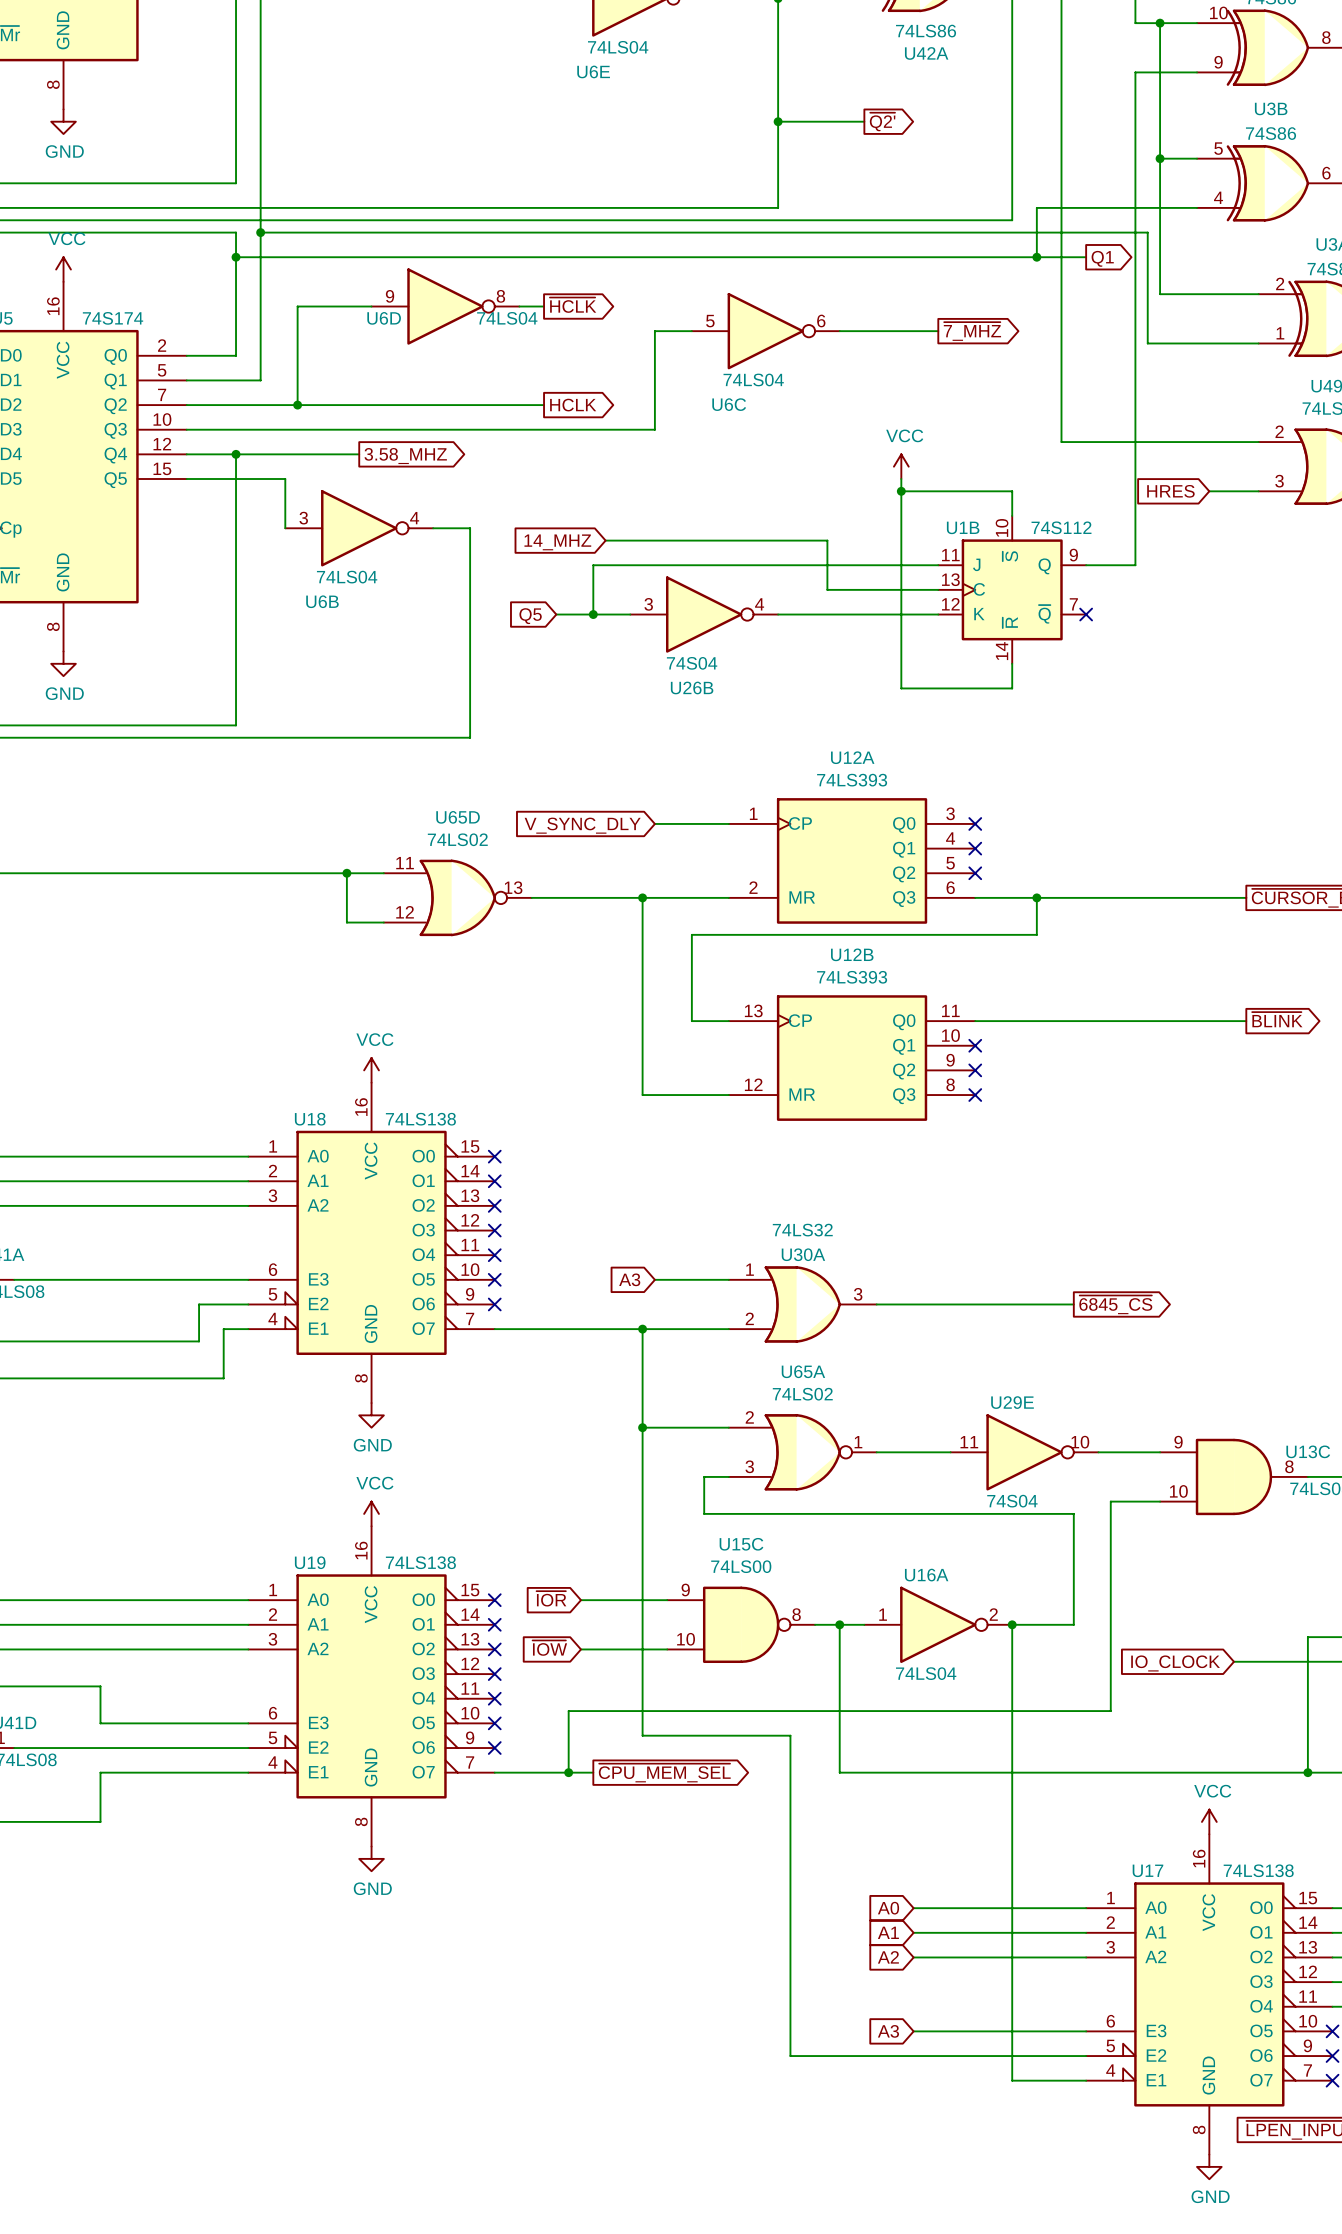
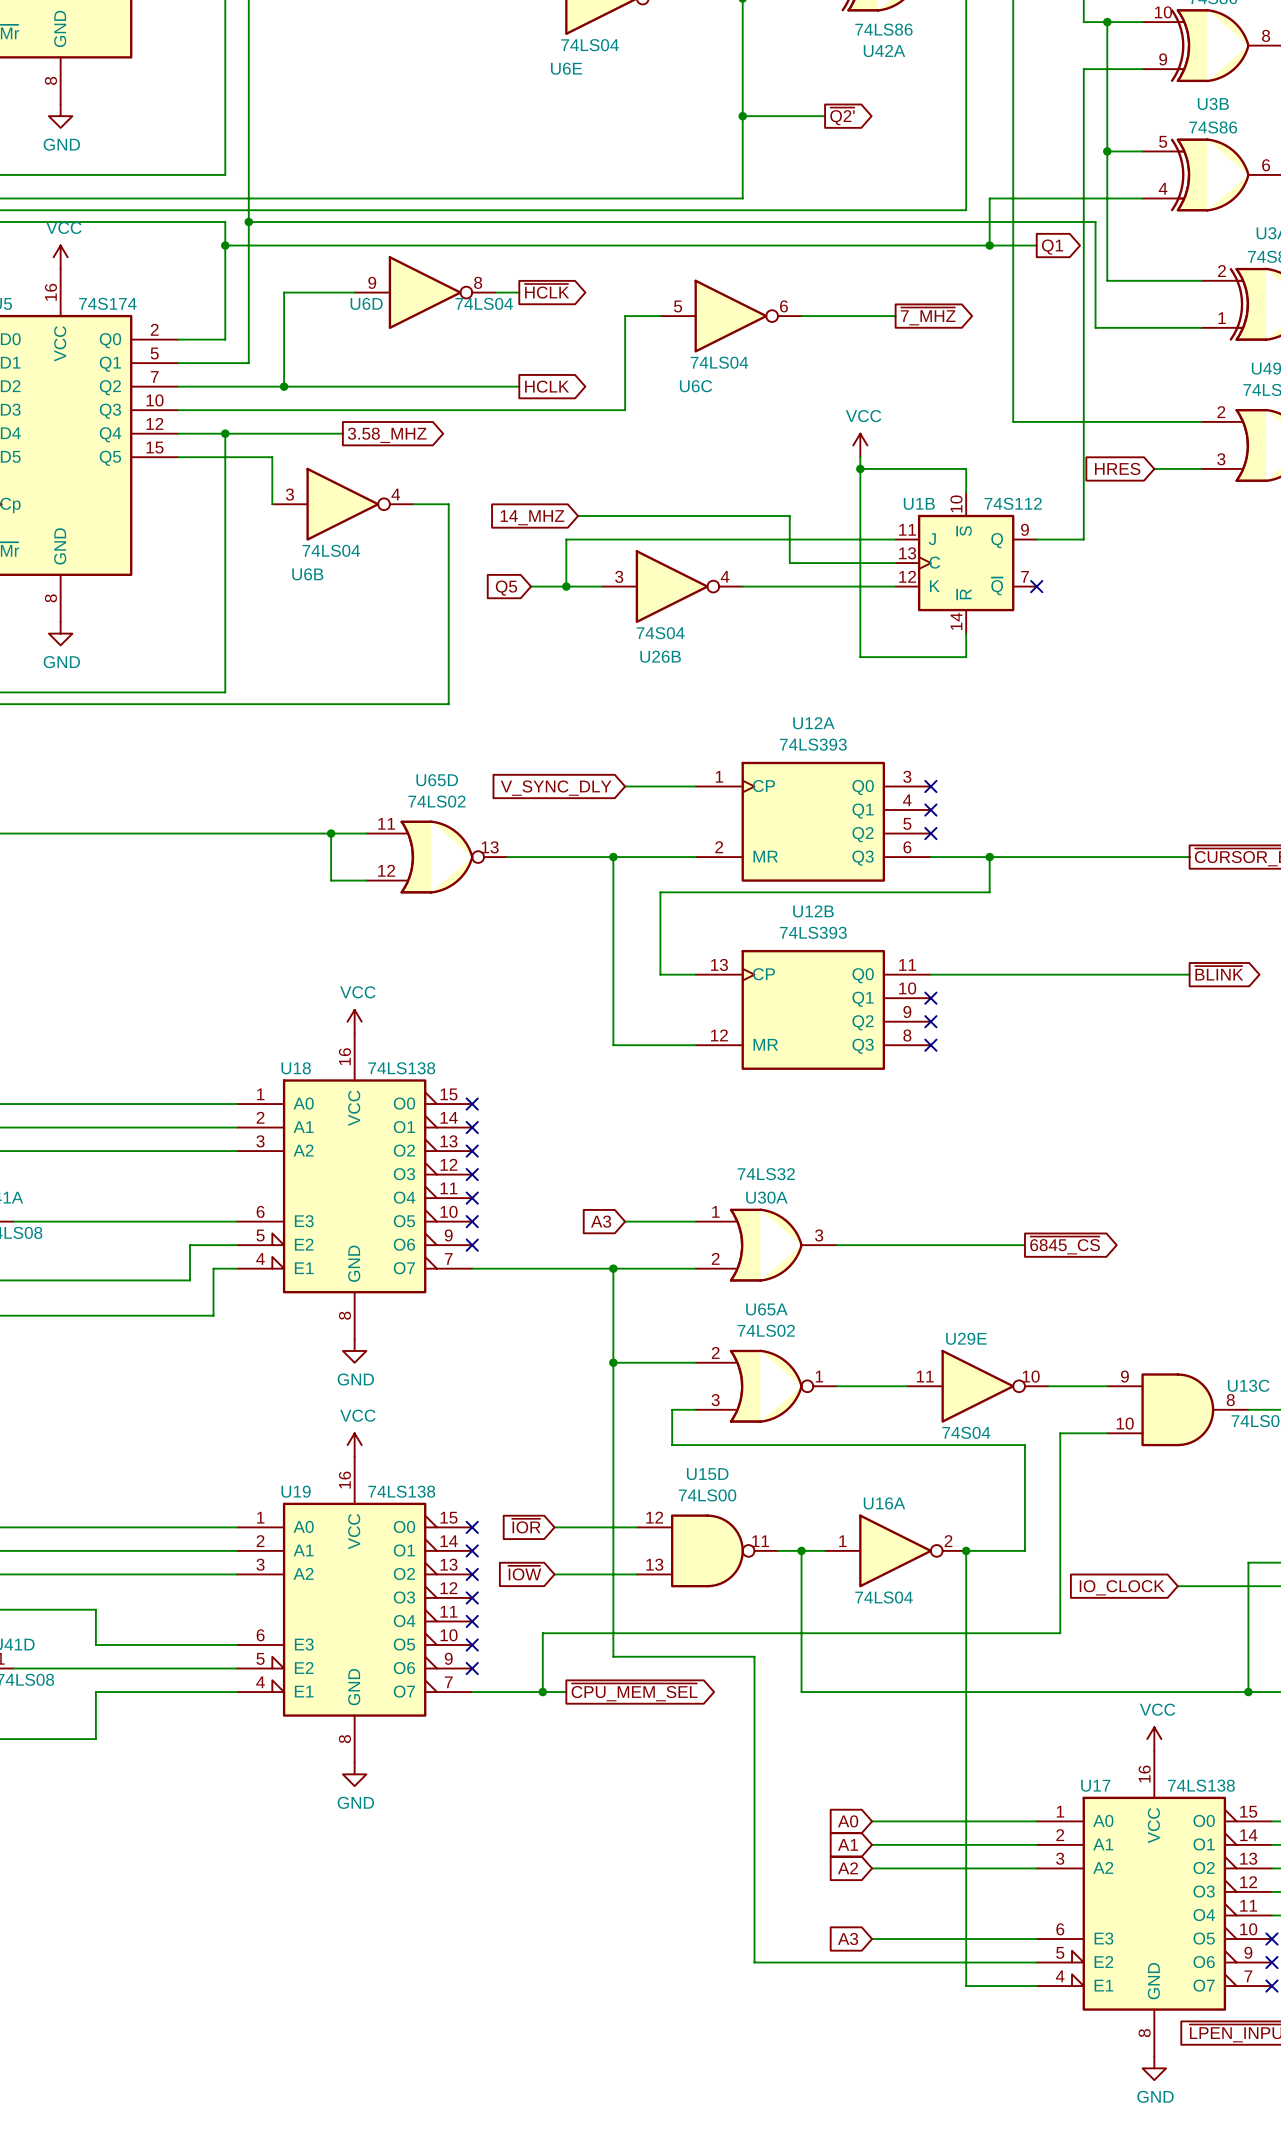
U15C name: U15C (741, 1544) -> U15D (707, 1474)
U15C pin number: 9 (685, 1590) -> 12 (654, 1517)
U15C pin number: 8 (796, 1614) -> 11 (760, 1541)
U15C pin number: 10 (686, 1639) -> 13 (654, 1564)

